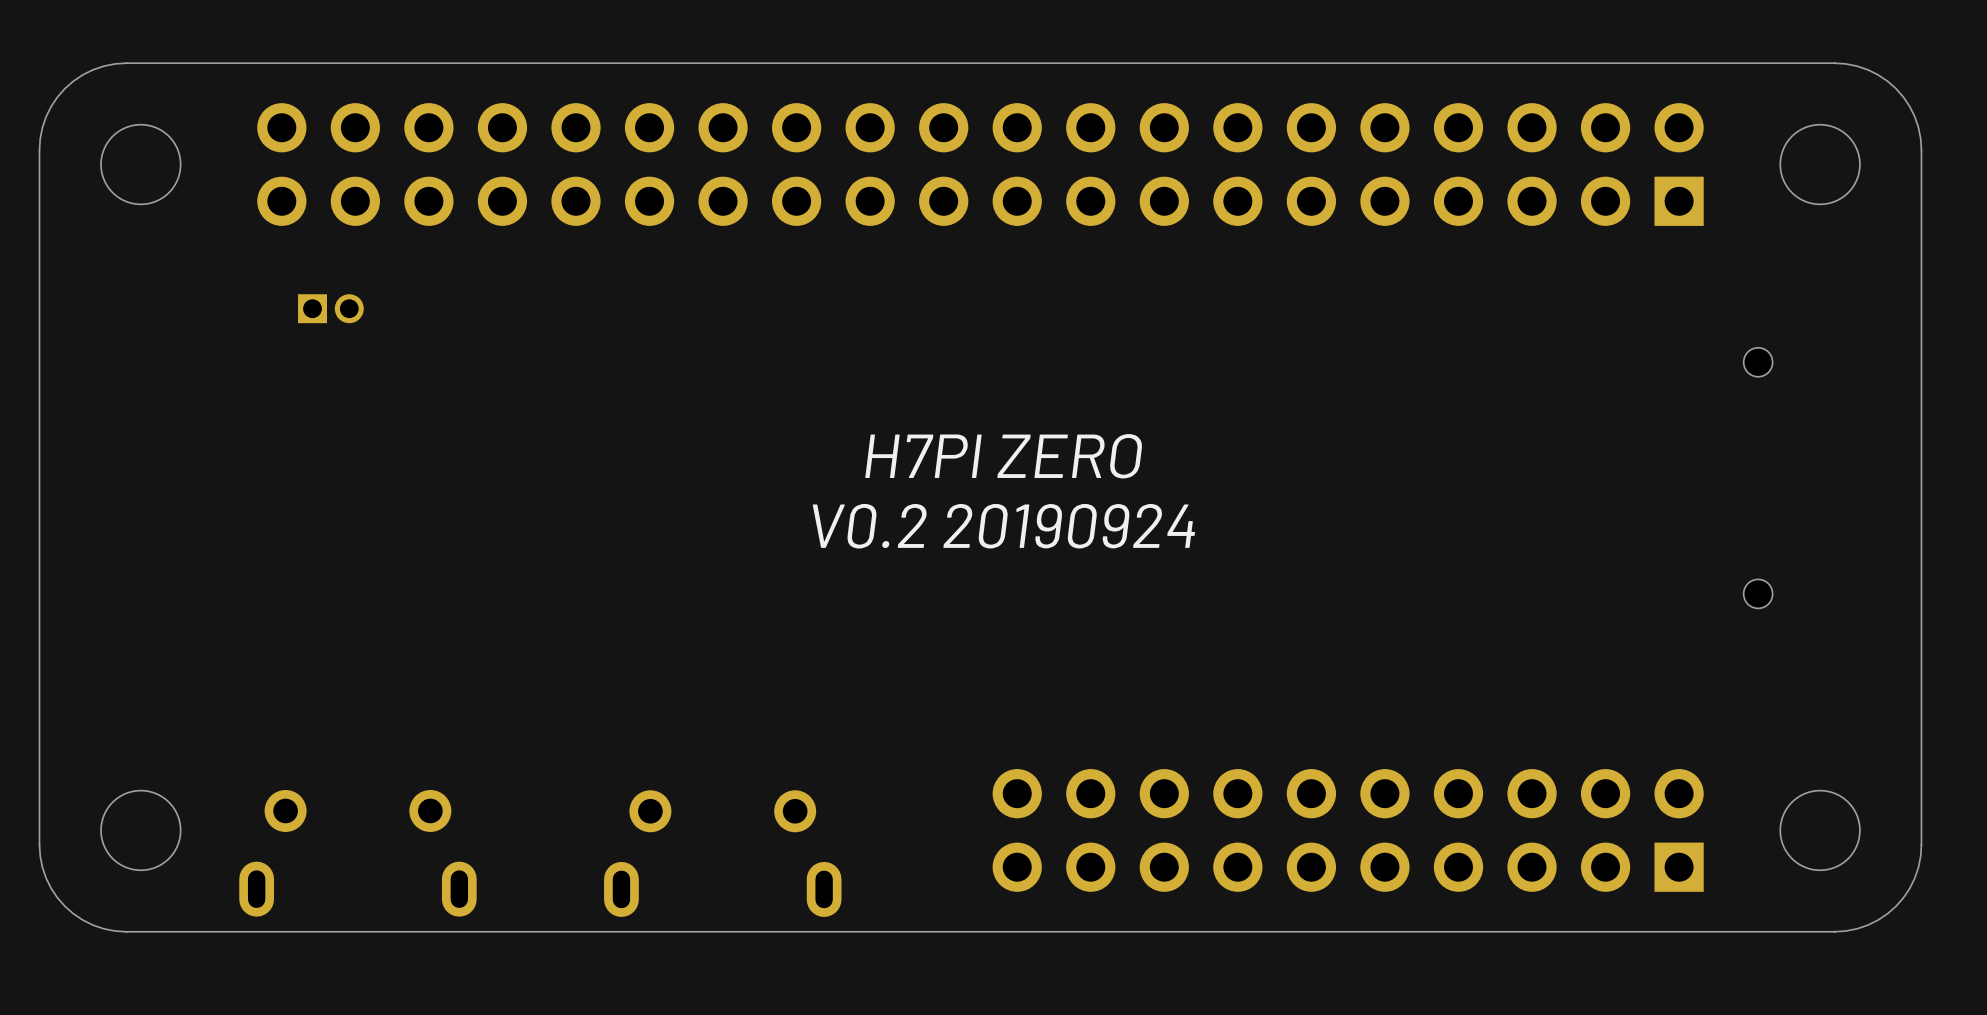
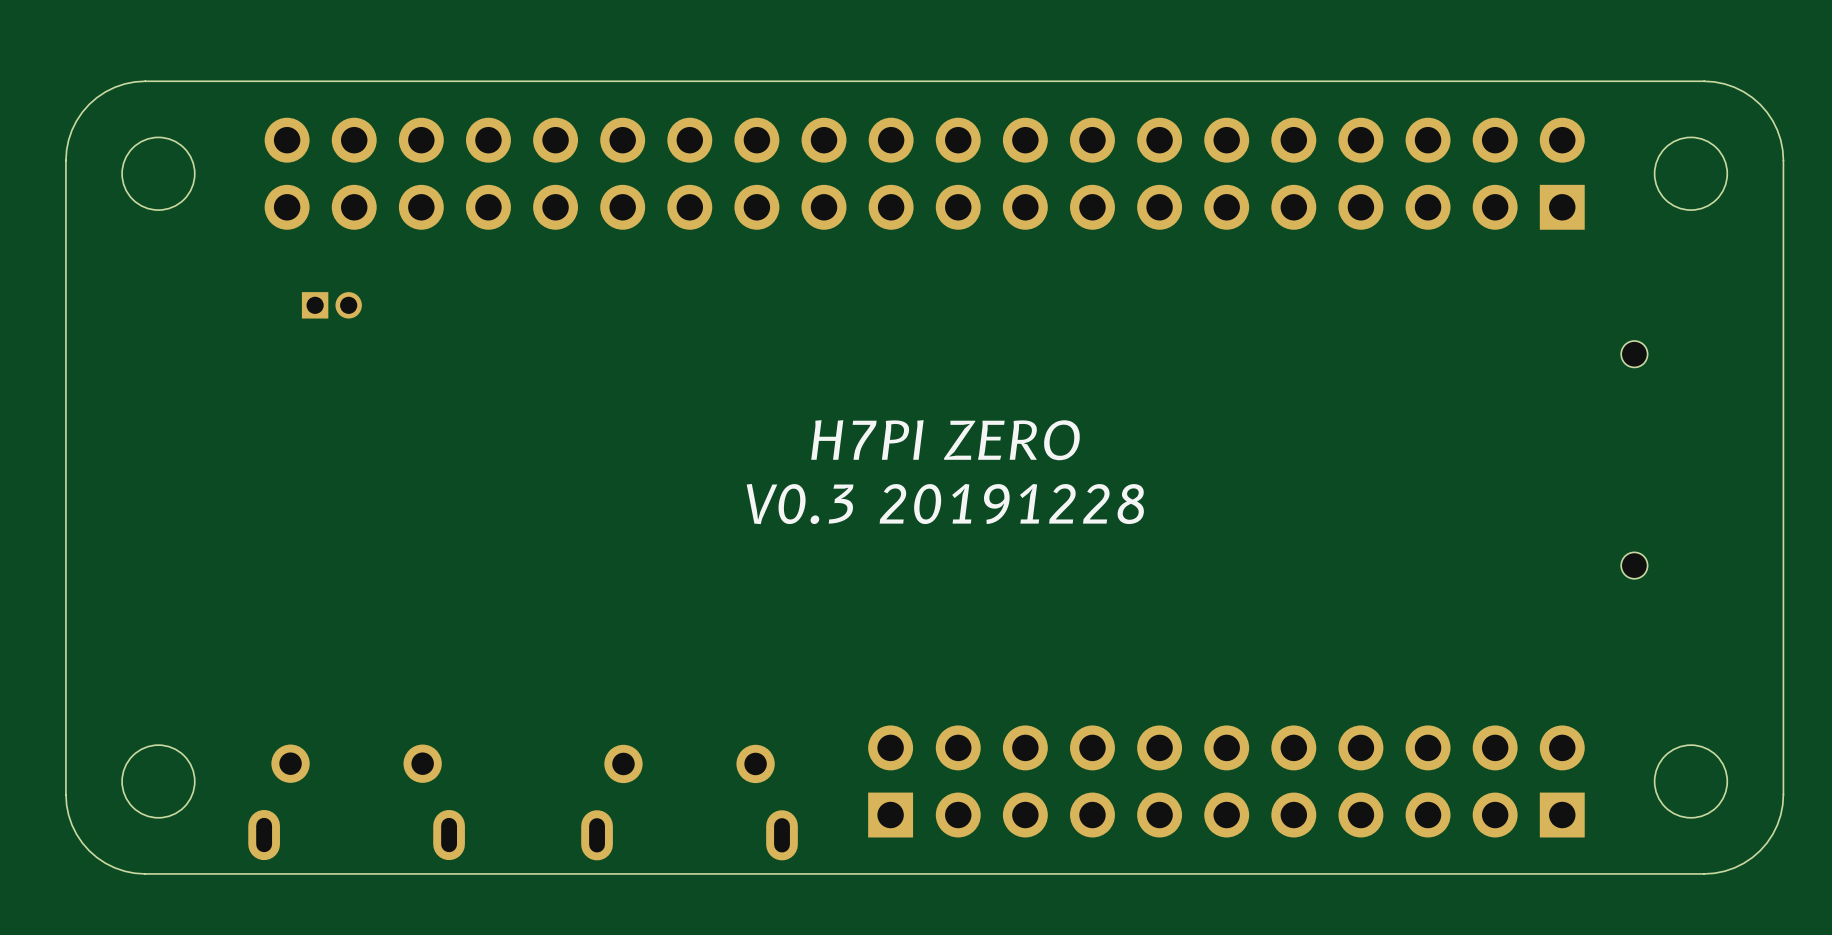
text: V0.2 20190924 (1003, 526) -> V0.3 20191228 (945, 504)
part: none -> (890, 781)

